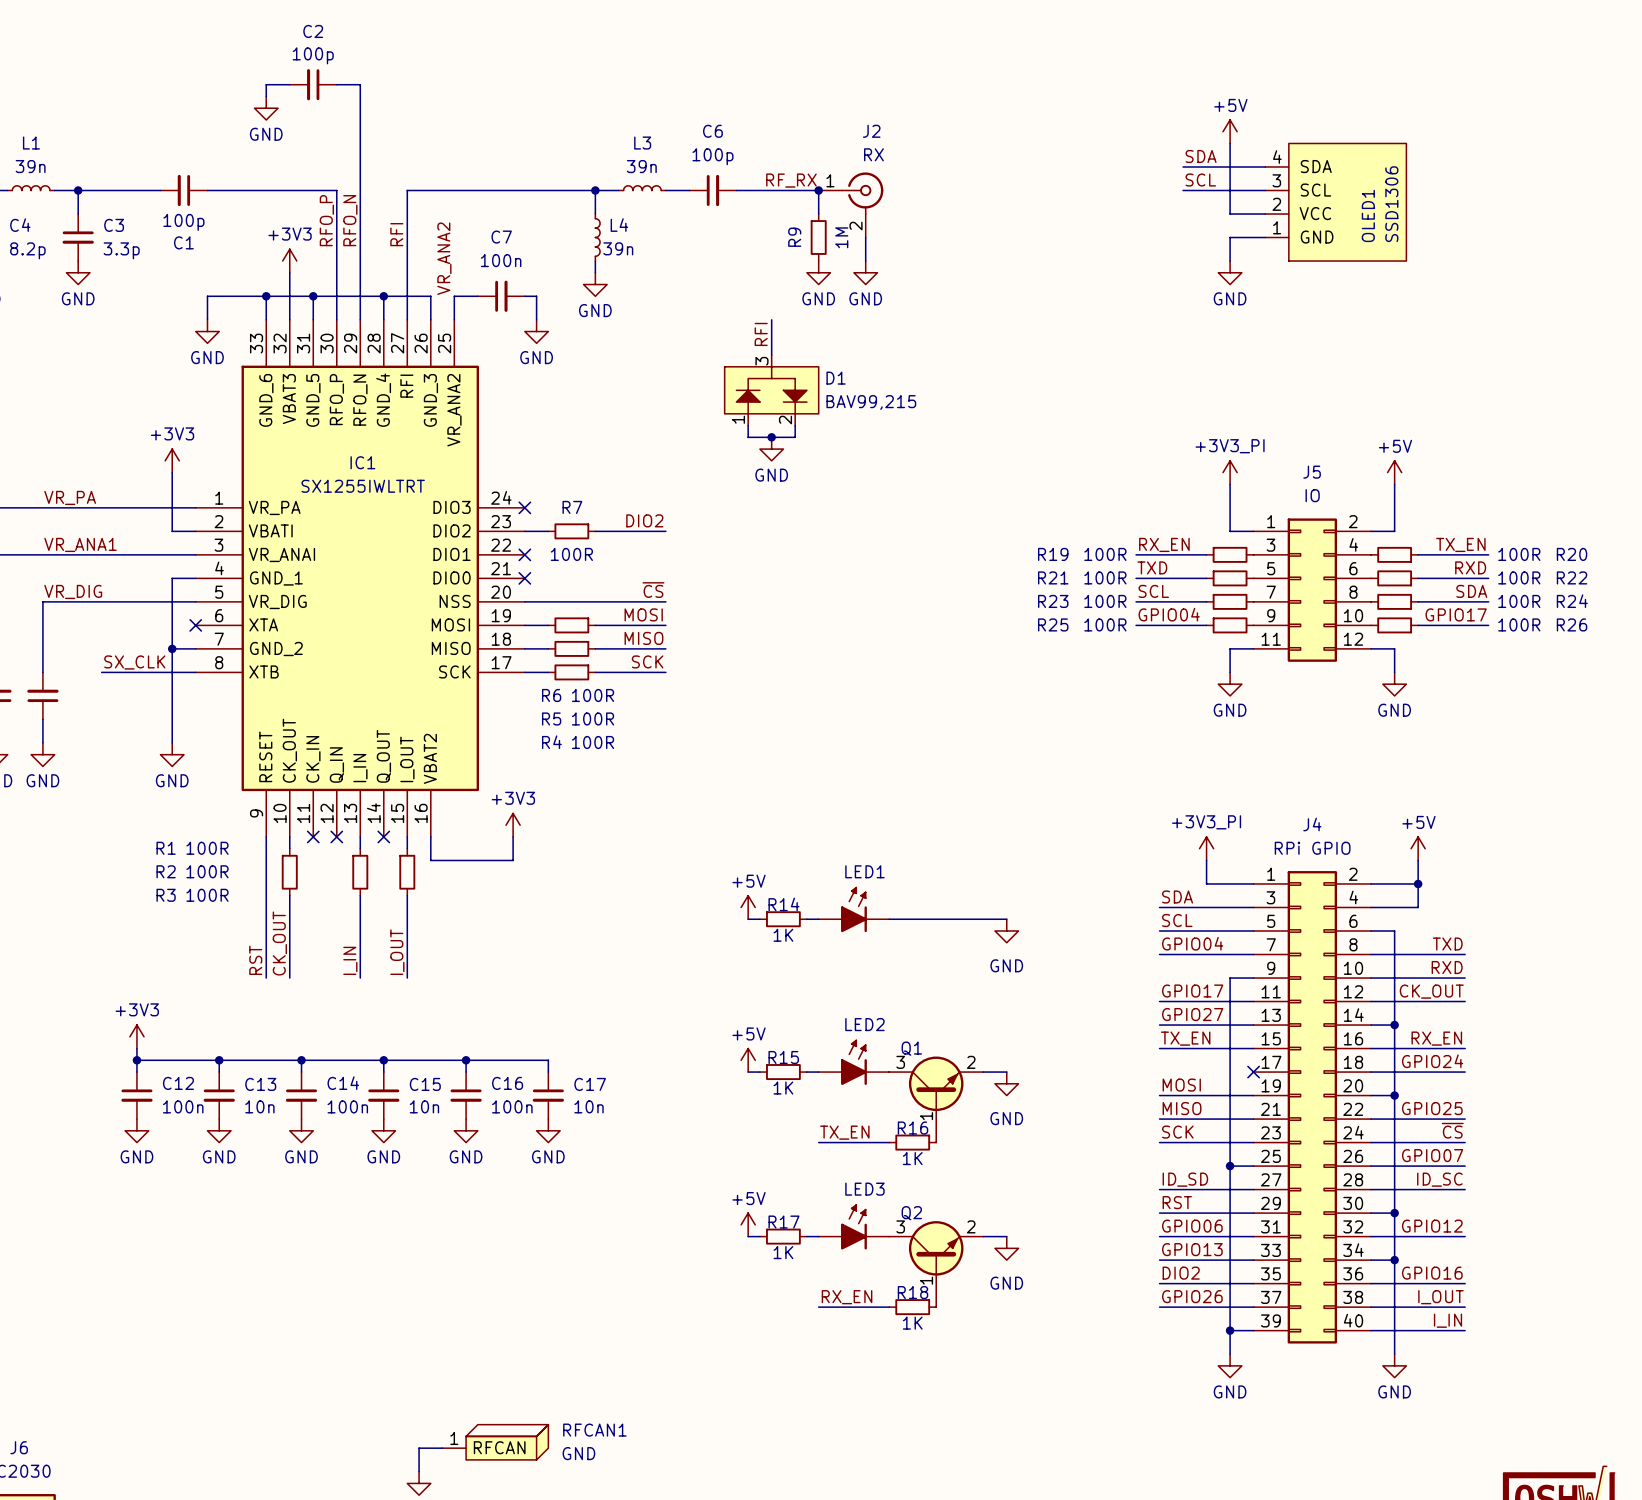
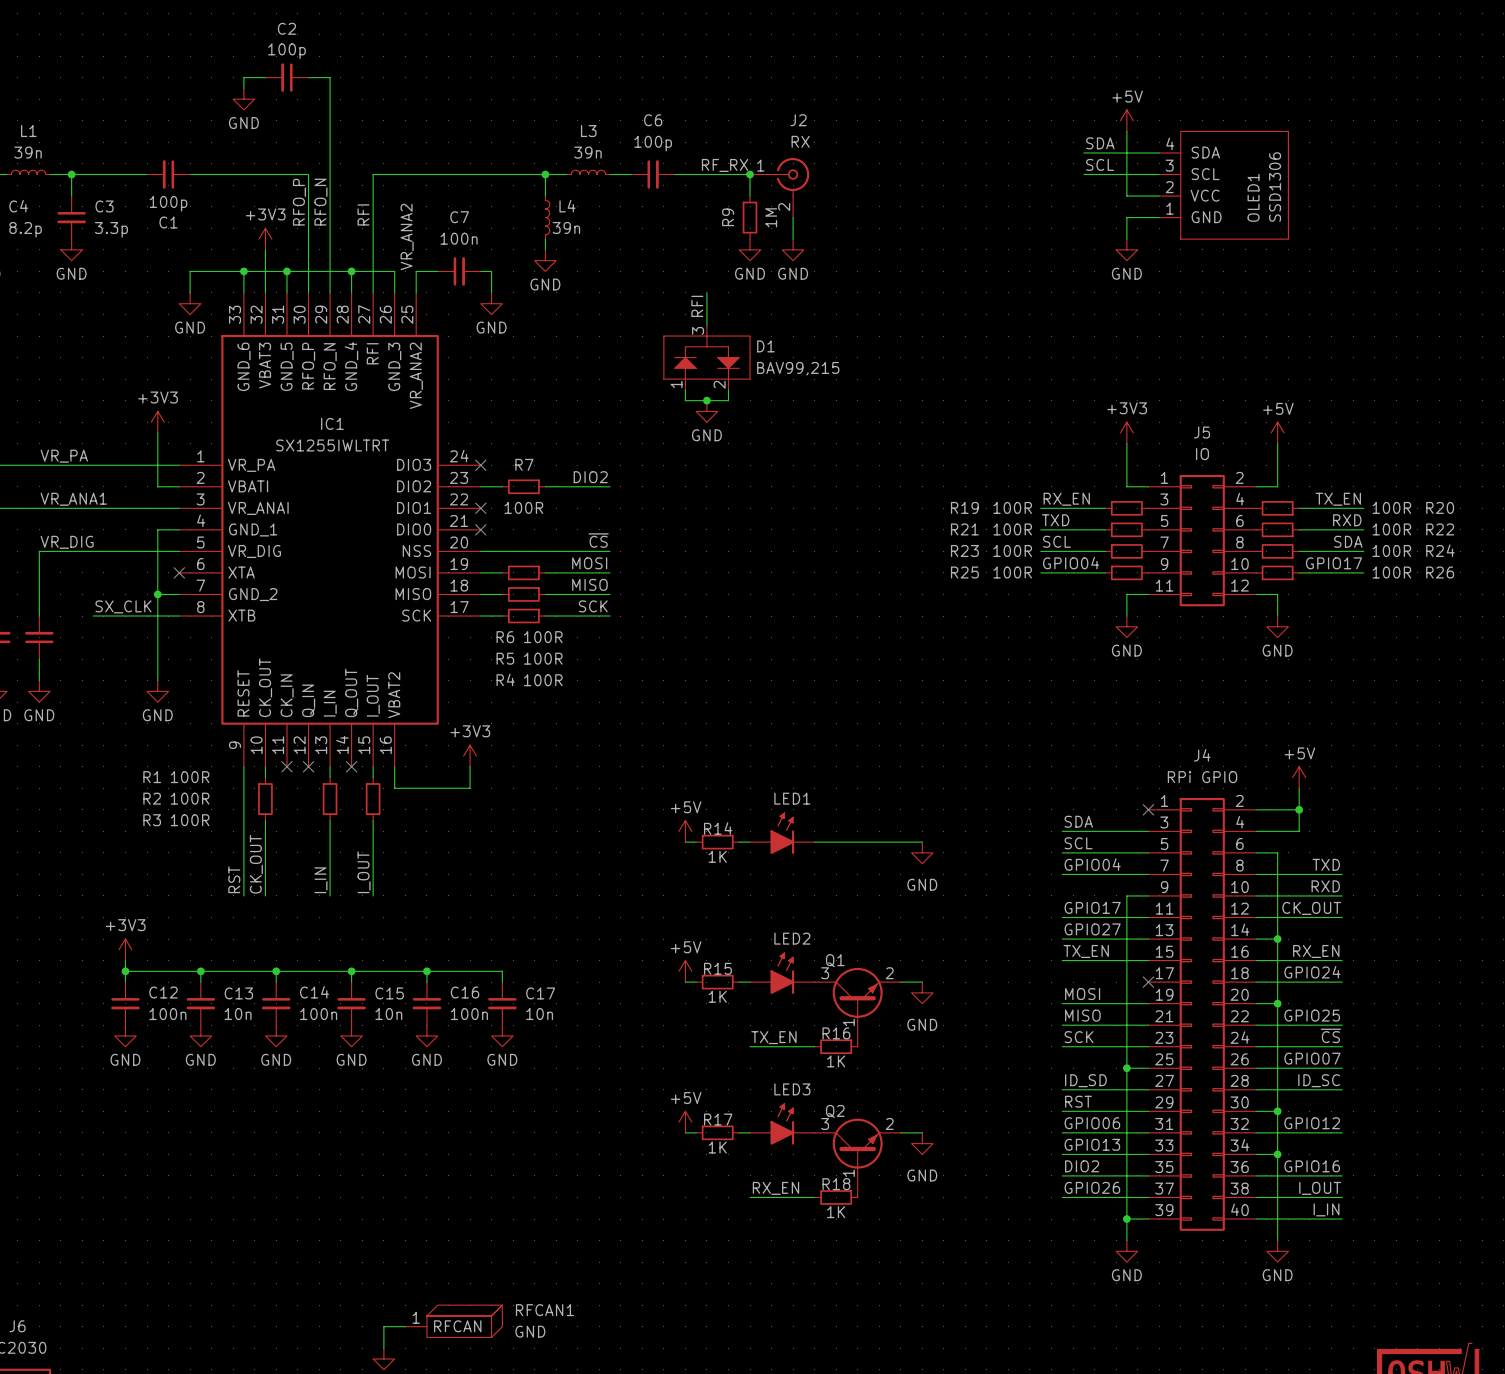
power symbol: +3V3_PI (1230, 472) -> +3V3 (1126, 432)
power symbol: +3V3_PI (1206, 848) -> none
wire: (1206, 860) (1206, 883) (1253, 883) -> none
no-connect mark: none -> (1148, 809)

